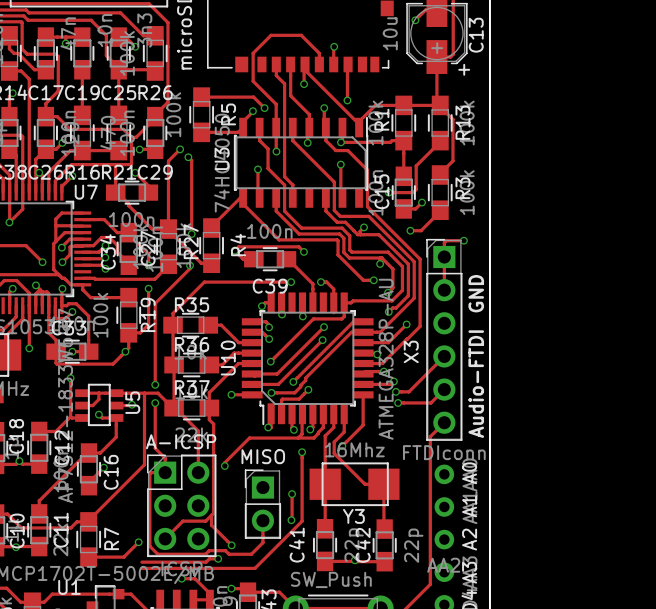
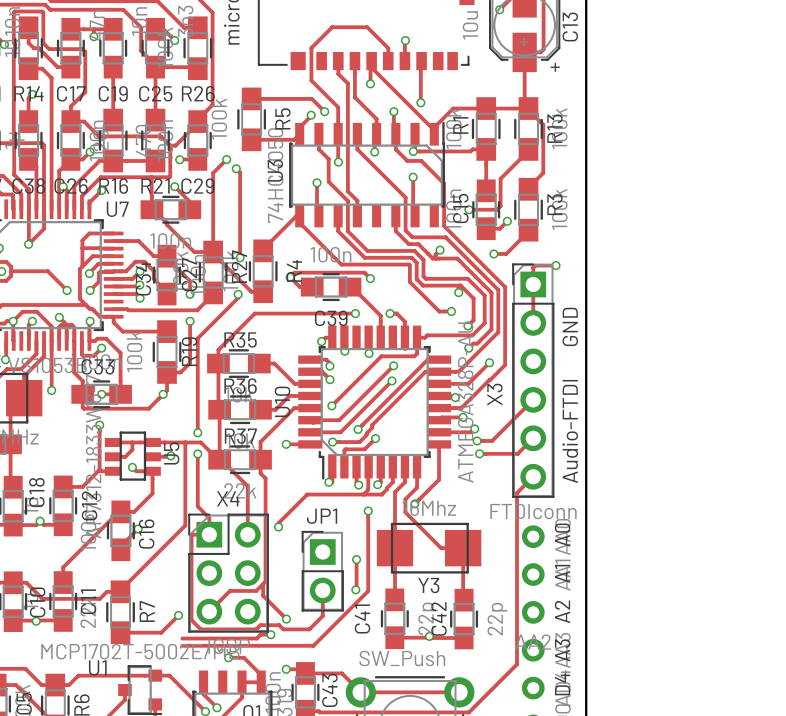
A-ICSP name: A-ICSP (181, 441) -> X4 (228, 498)
MISO name: MISO (263, 456) -> JP1 (322, 516)

